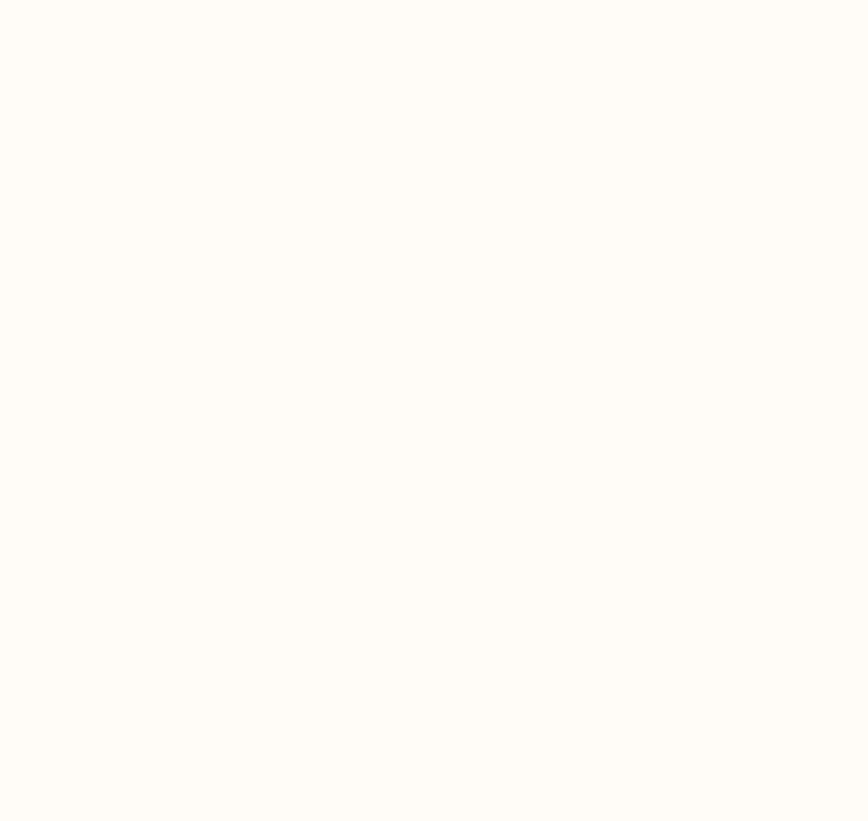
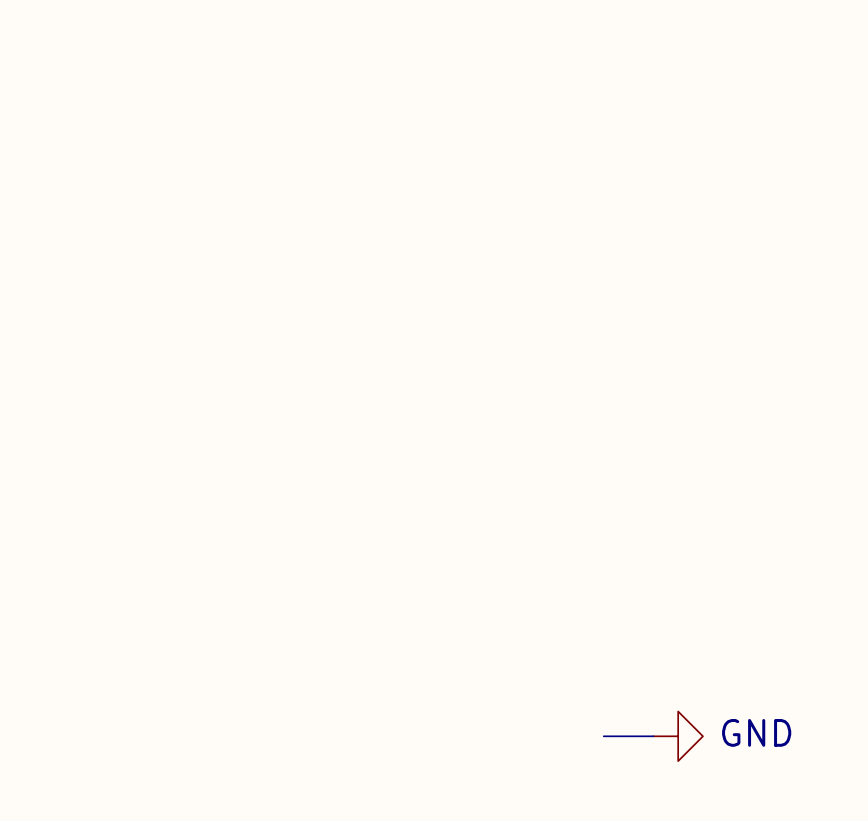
wire: none -> (603, 736) (653, 736)
power symbol: none -> GND (678, 736)

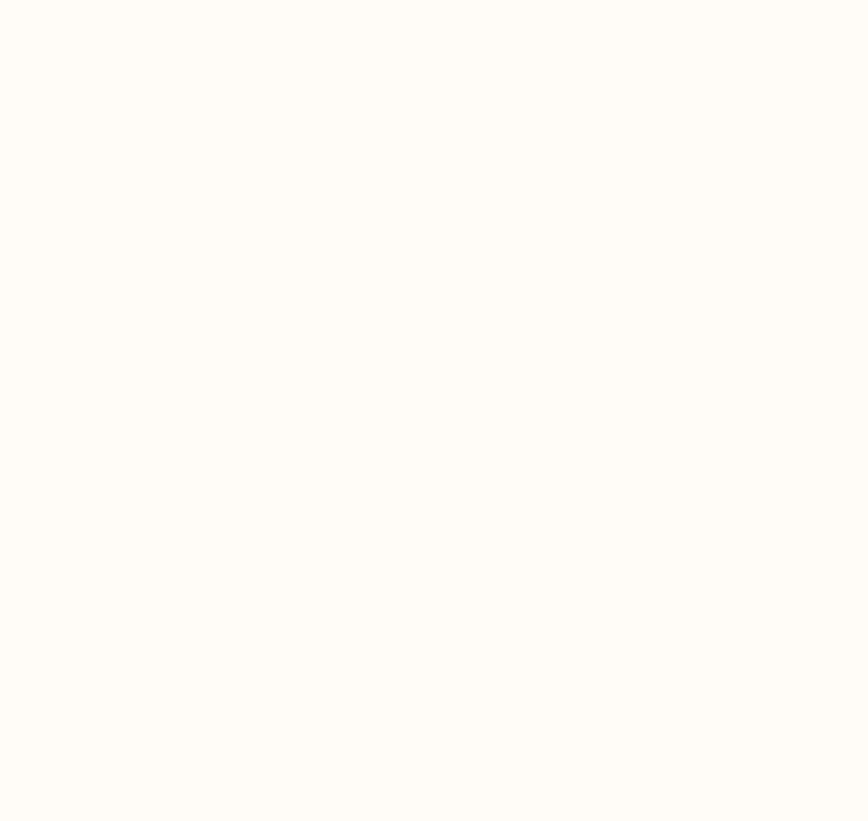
wire: (603, 736) (653, 736) -> none
power symbol: GND (678, 736) -> none

